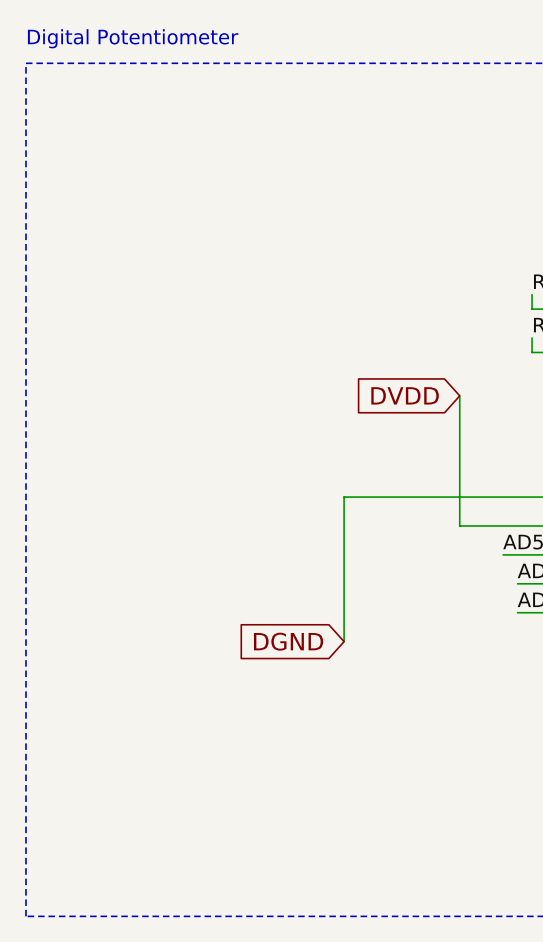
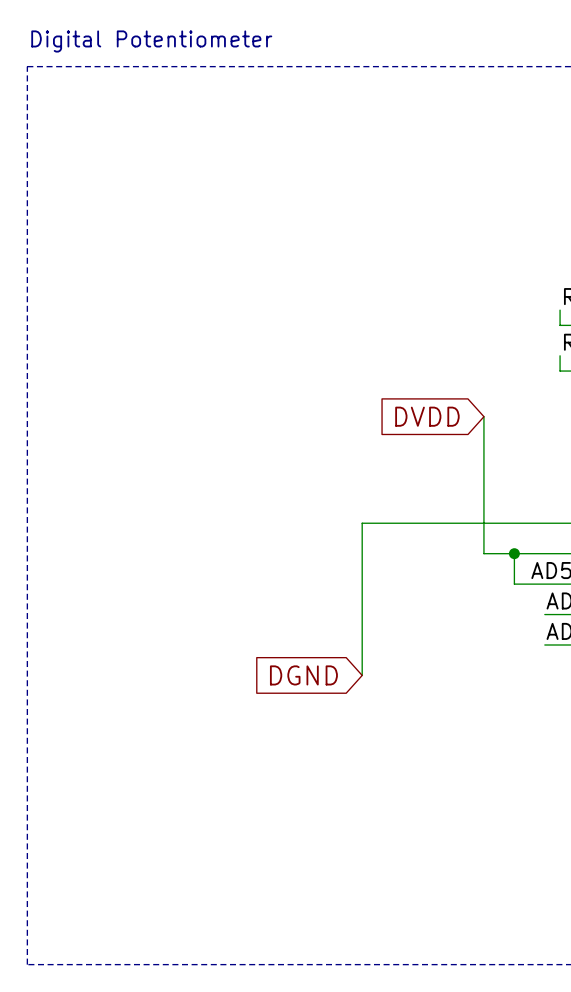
wire: none -> (514, 553) (514, 584) (529, 584)
junction: none -> (514, 553)

